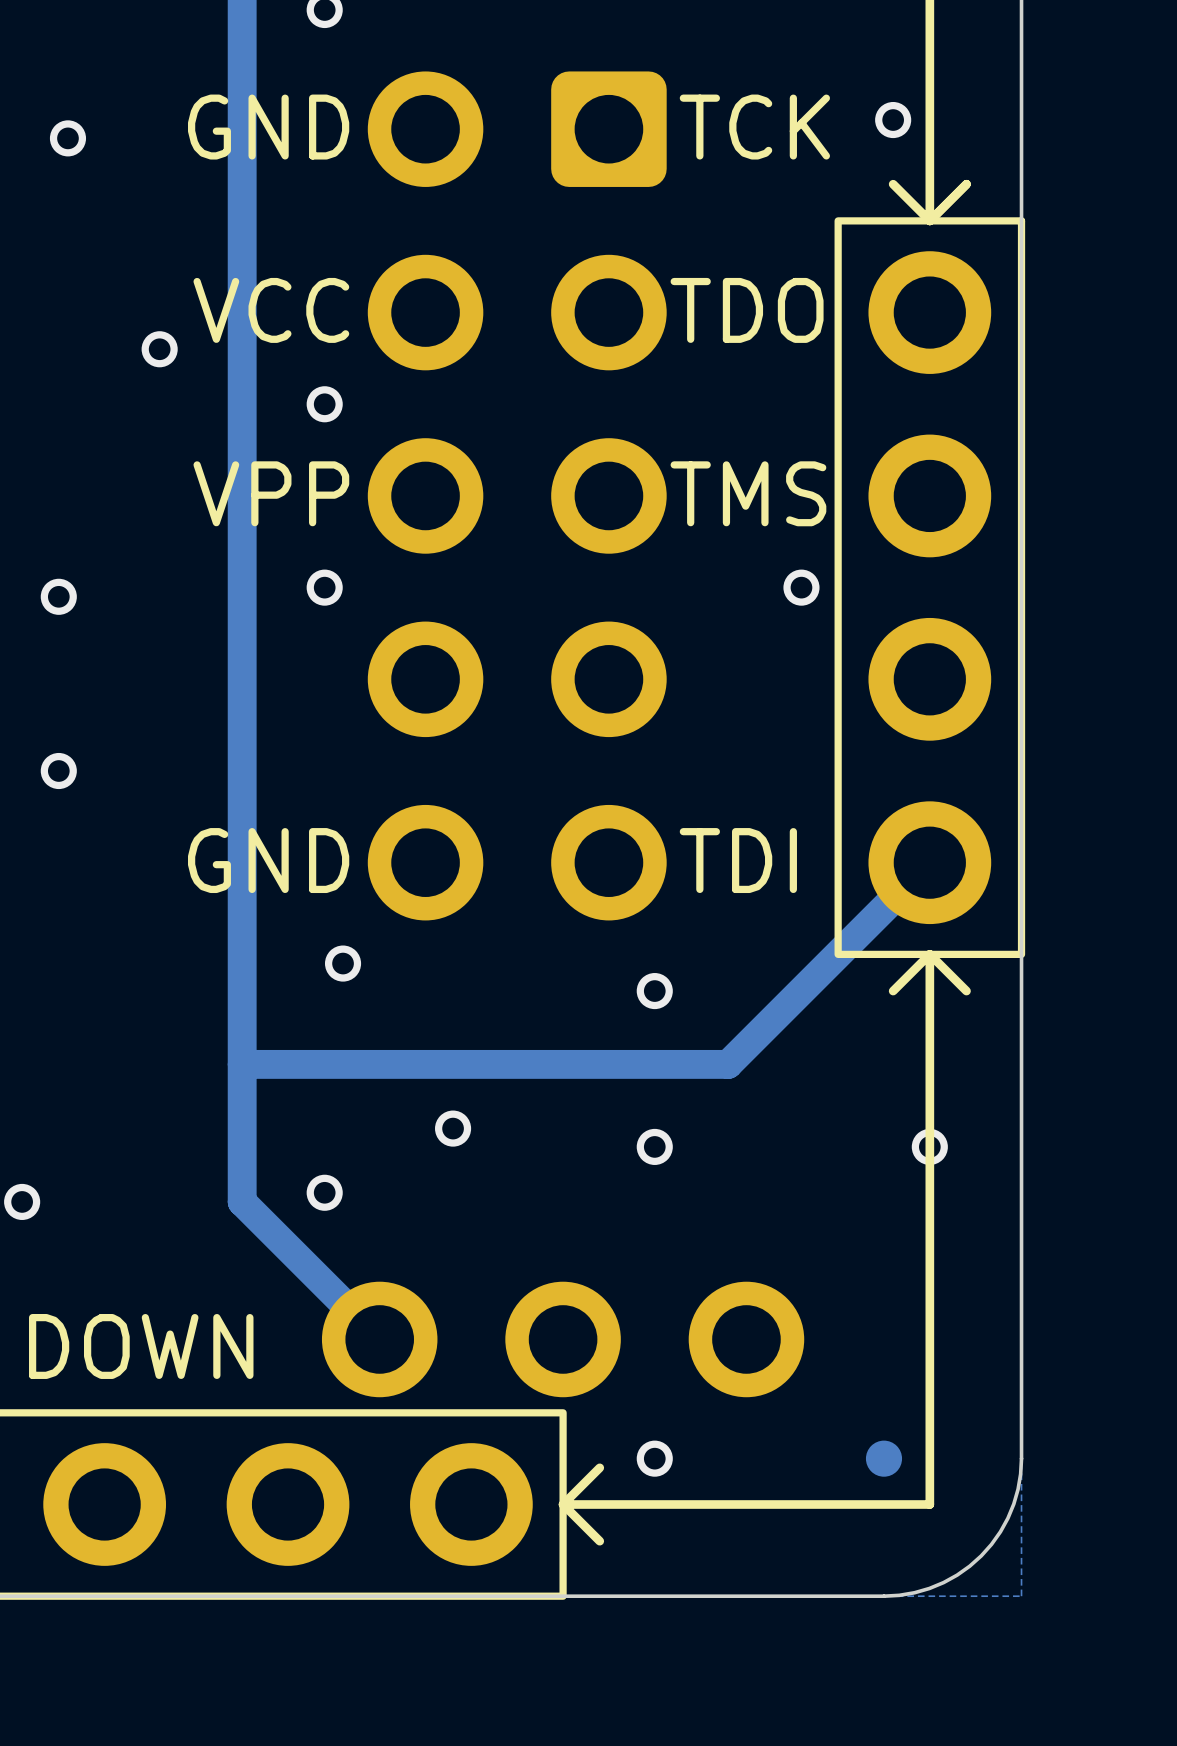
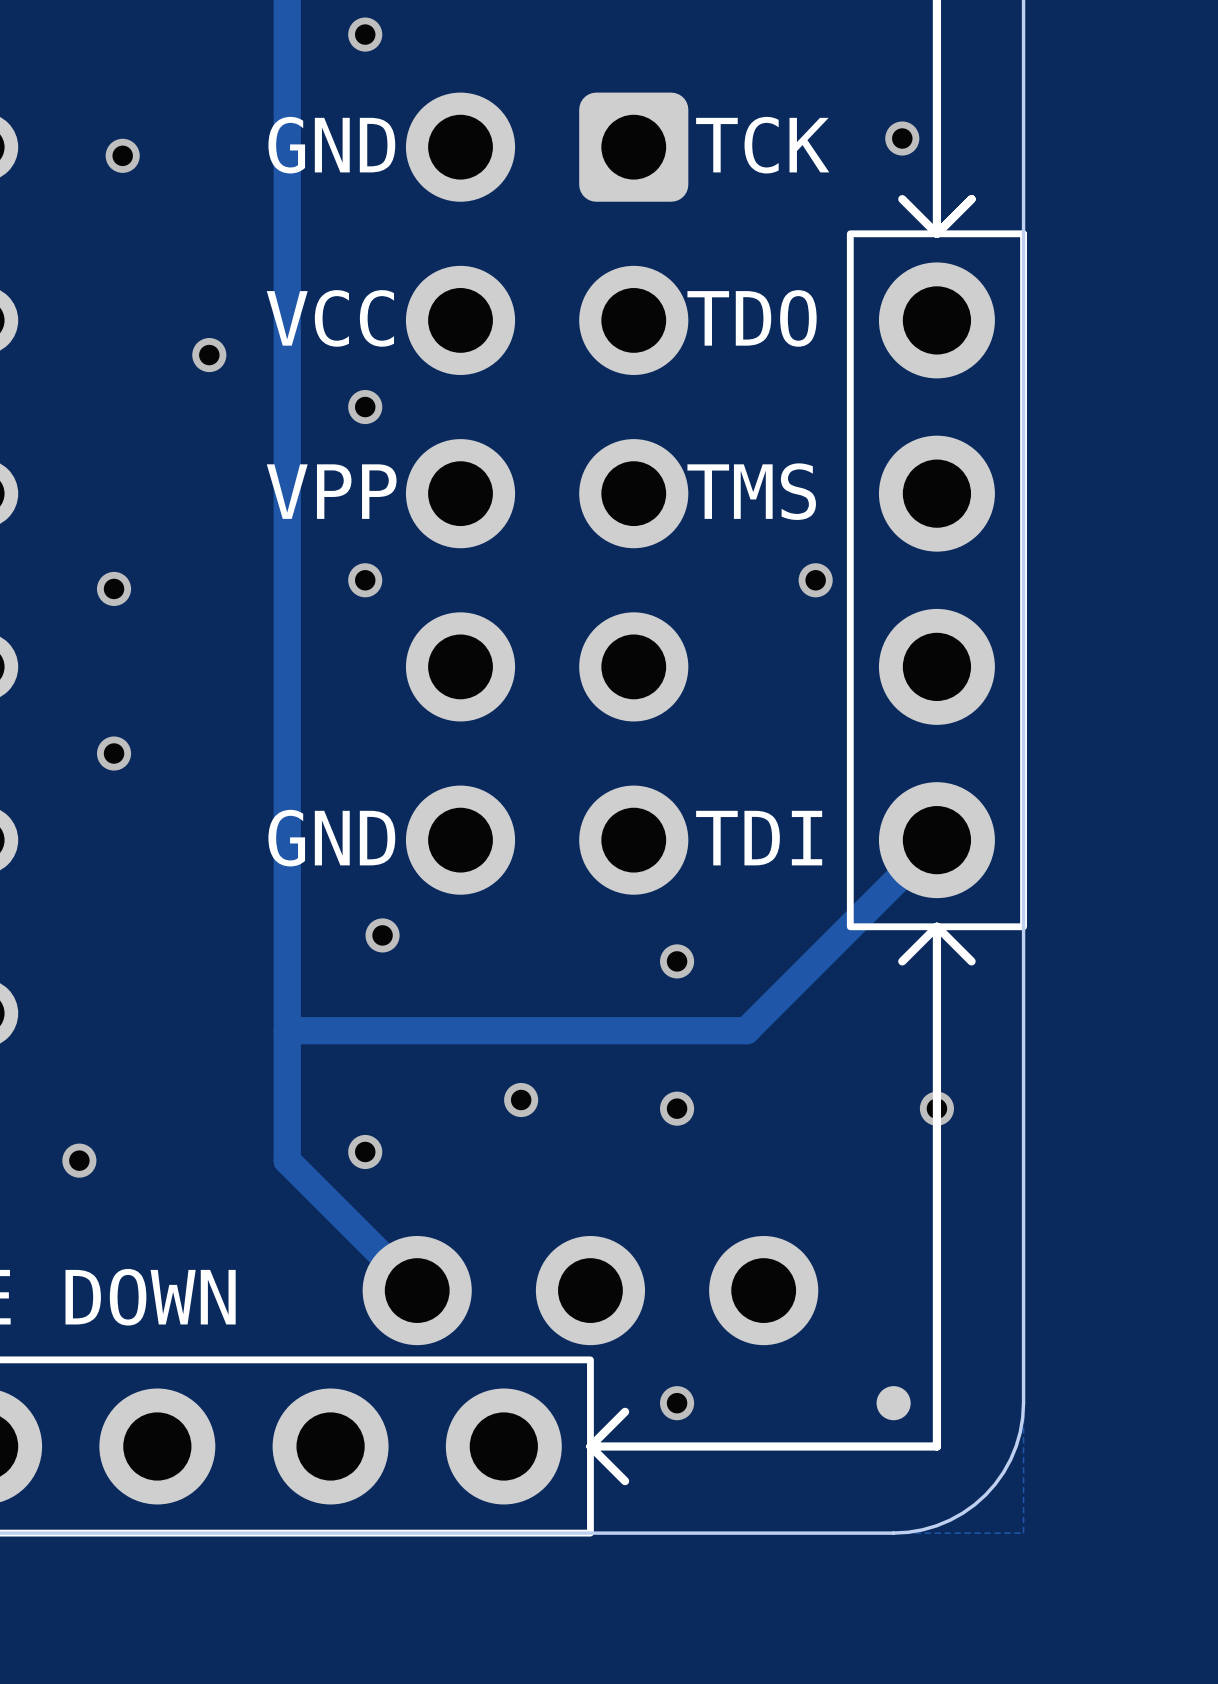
via position: (453, 1128) -> (521, 1100)

